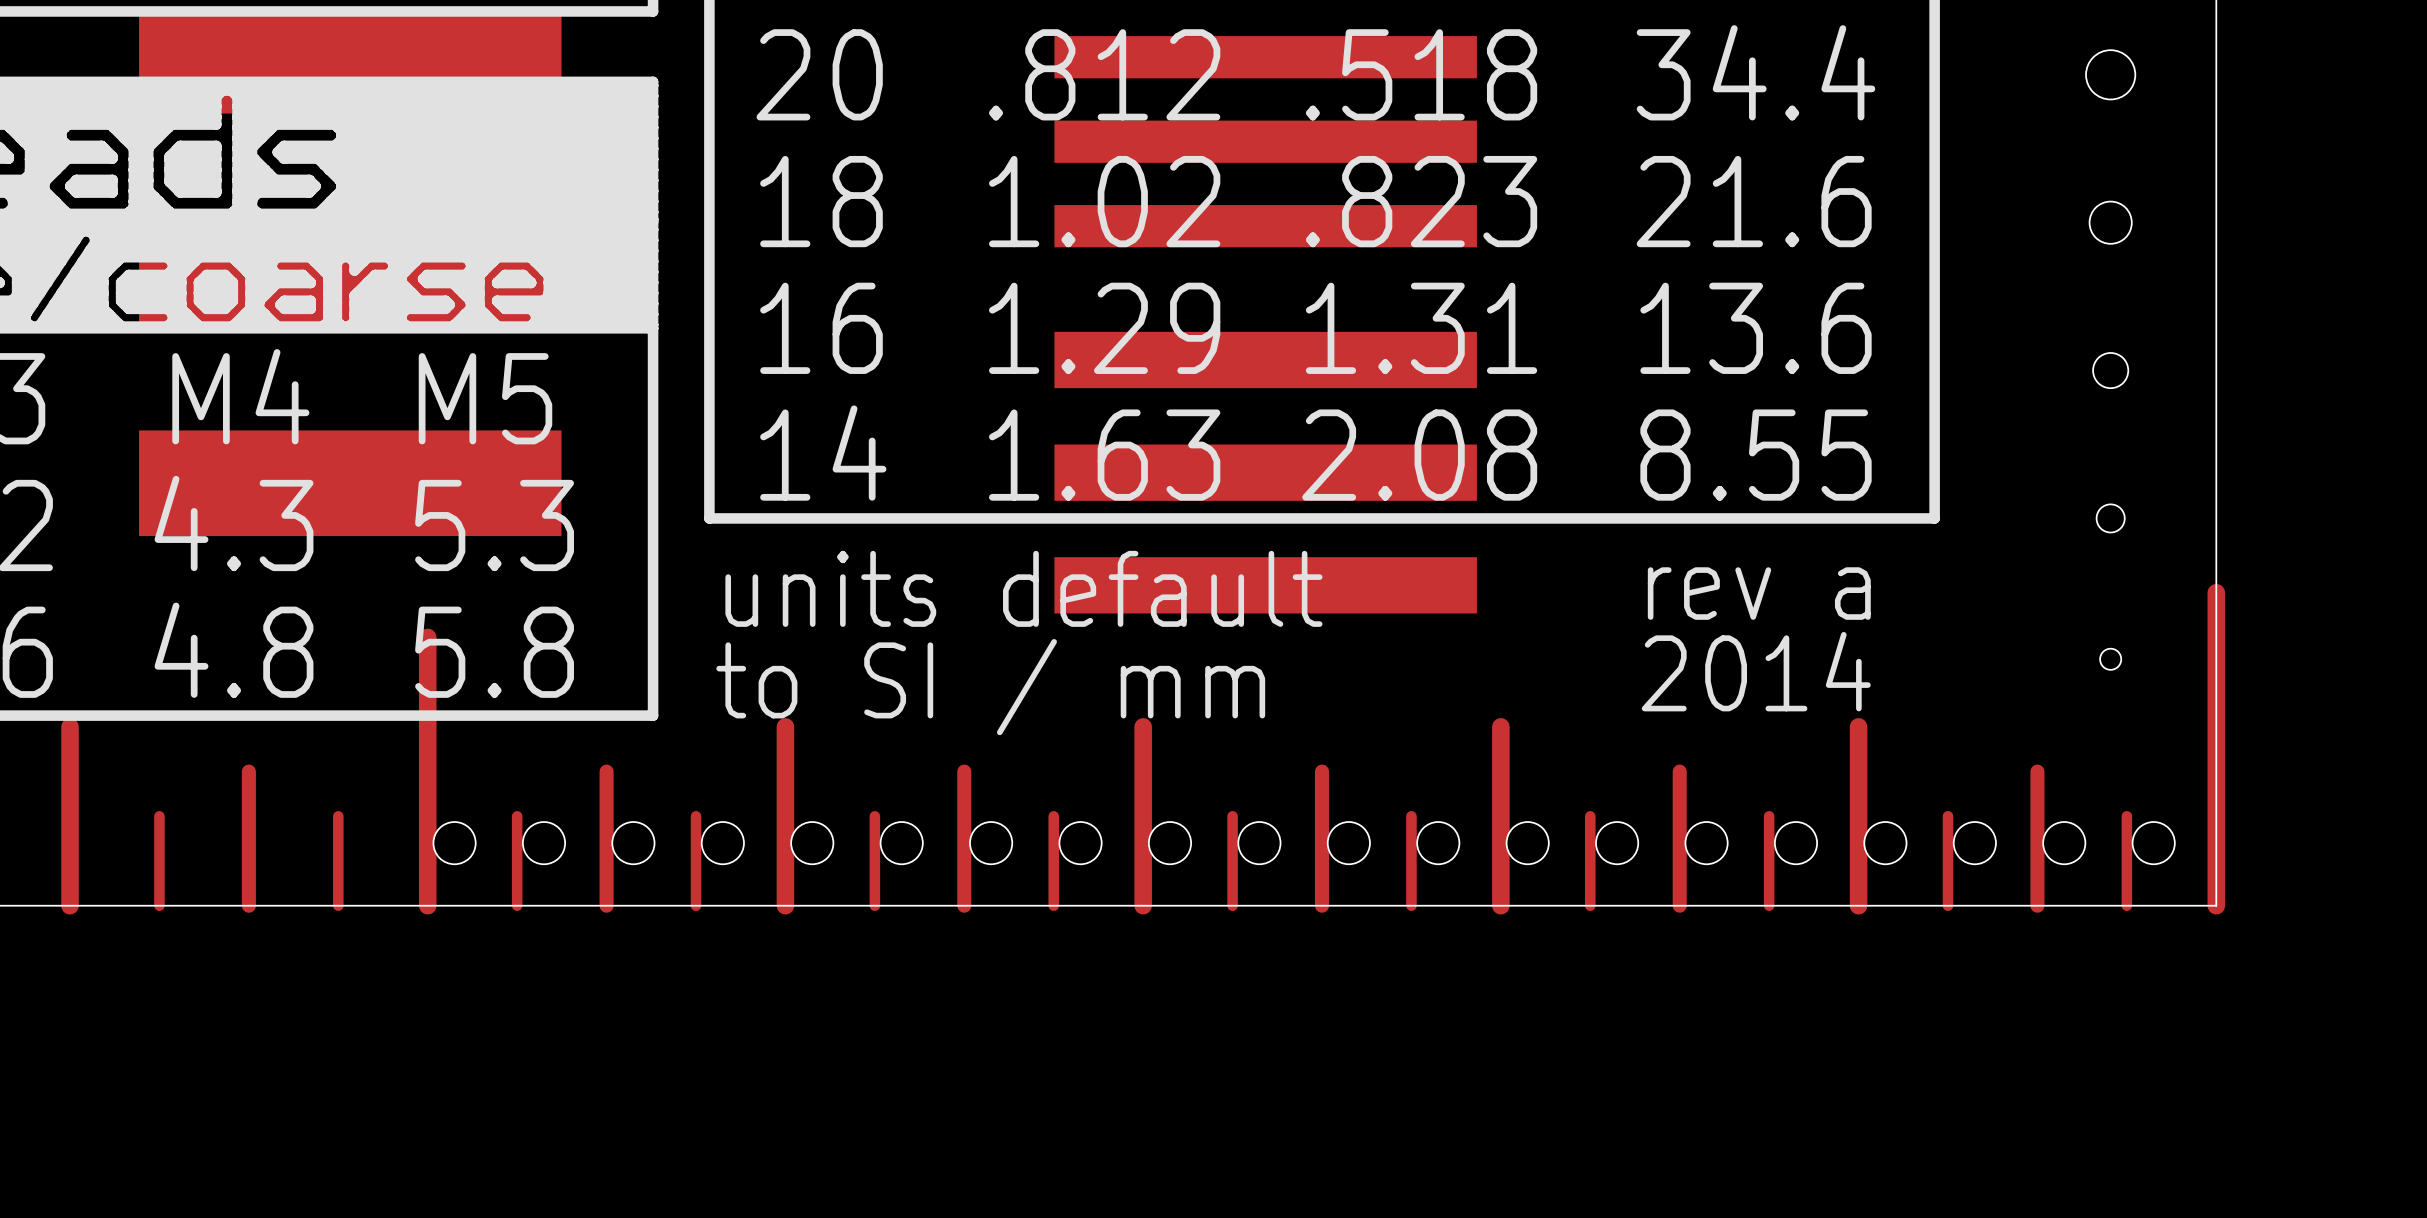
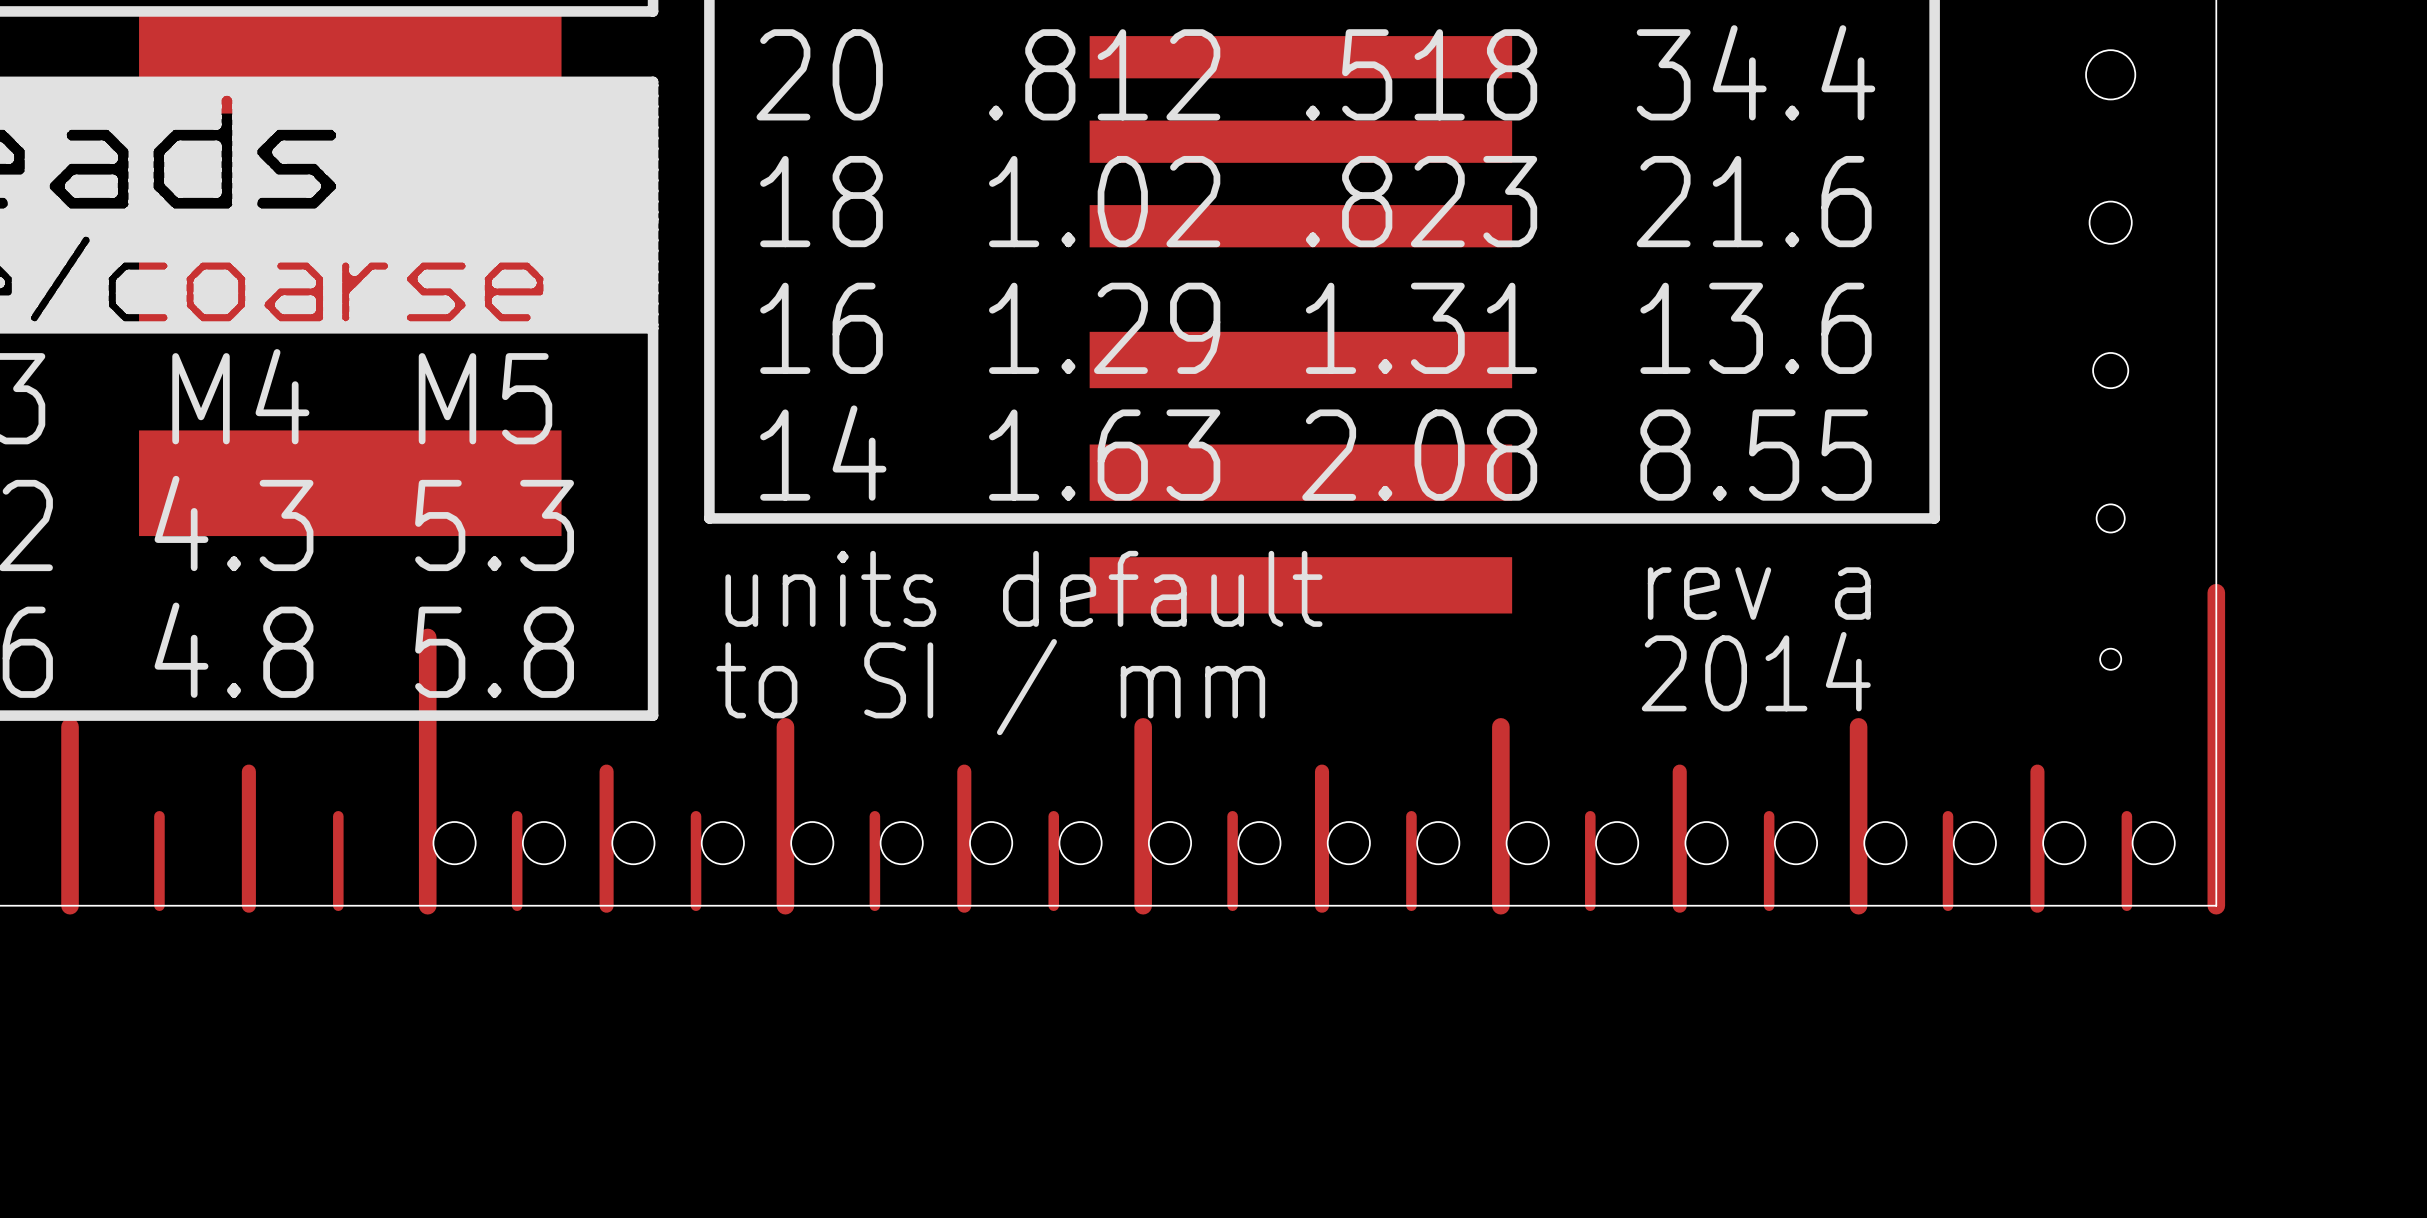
part position: (1265, 141) -> (1300, 141)
part position: (1265, 472) -> (1300, 472)

